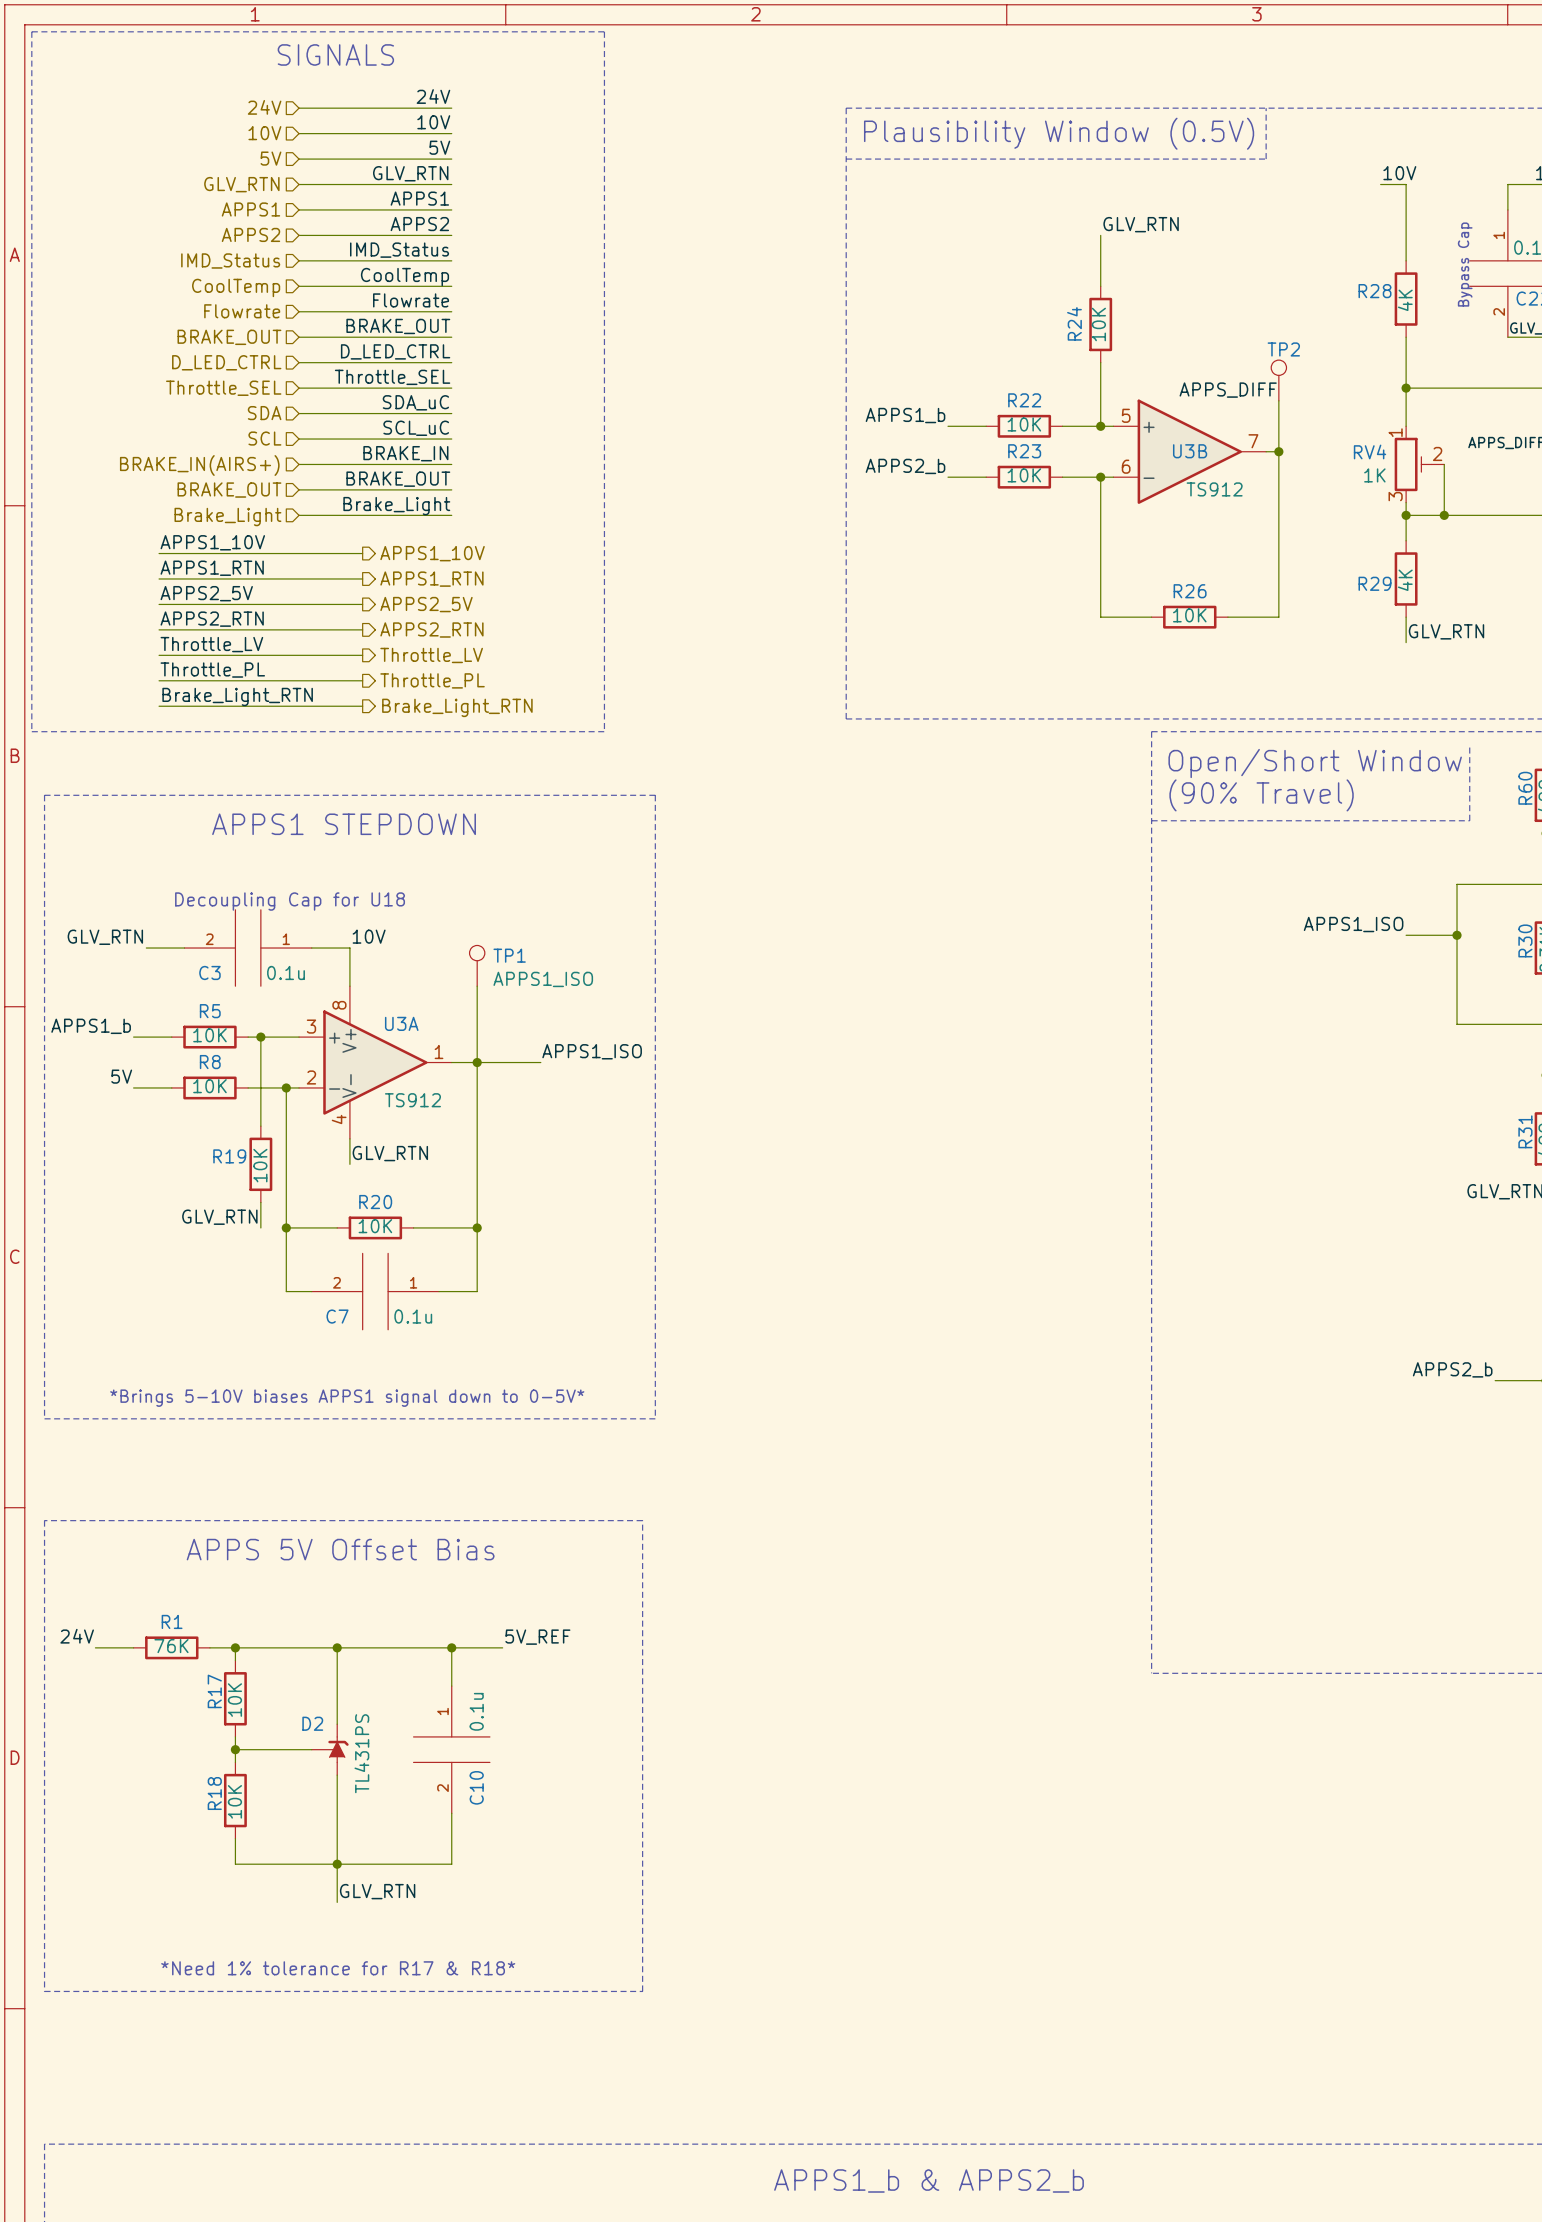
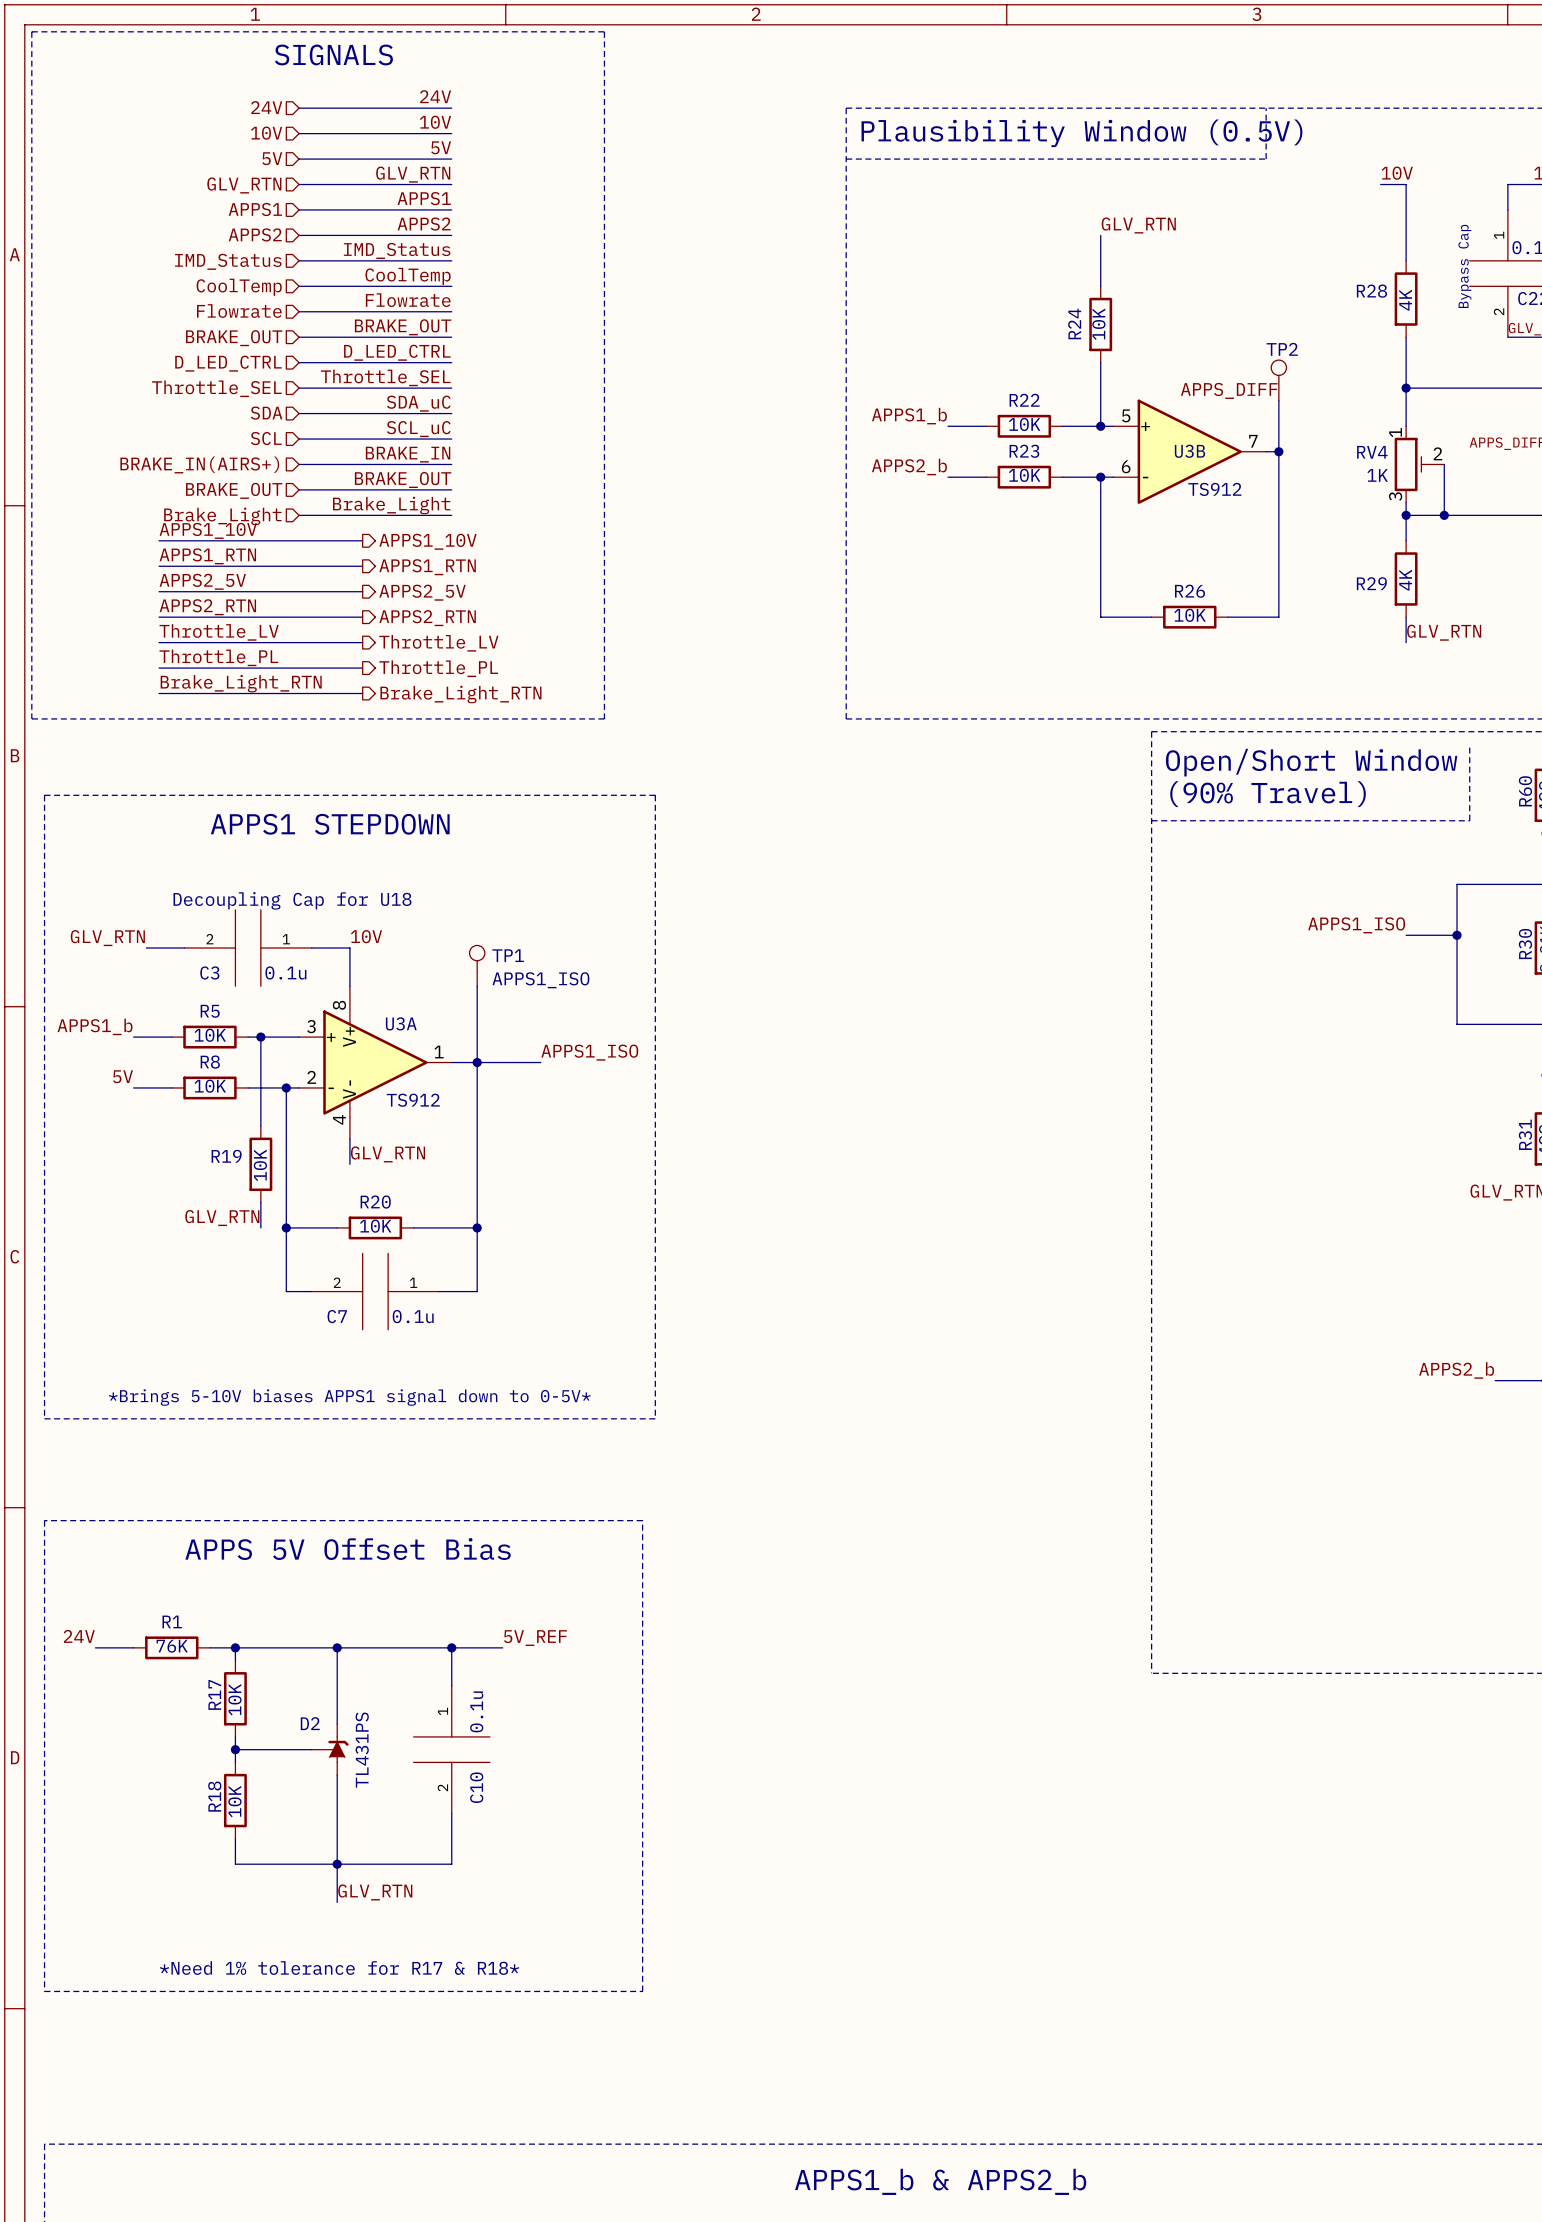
label position: APPS1_10V (212, 542) -> APPS1_10V (208, 530)
wire: (159, 553) (362, 553) -> (159, 540) (362, 540)
hierarchical label position: APPS1_10V (432, 553) -> APPS1_10V (428, 541)
label position: APPS1_RTN (212, 568) -> APPS1_RTN (207, 556)
wire: (159, 578) (362, 578) -> (159, 566) (362, 566)
hierarchical label position: APPS1_RTN (431, 579) -> APPS1_RTN (427, 567)
label position: APPS2_5V (206, 593) -> APPS2_5V (202, 581)
wire: (159, 604) (362, 604) -> (159, 591) (362, 591)
hierarchical label position: APPS2_5V (426, 604) -> APPS2_5V (422, 592)
label position: APPS2_RTN (212, 619) -> APPS2_RTN (207, 607)
wire: (159, 629) (362, 629) -> (159, 617) (362, 617)
hierarchical label position: APPS2_RTN (431, 630) -> APPS2_RTN (427, 618)
label position: Throttle_LV (211, 644) -> Throttle_LV (219, 632)
wire: (159, 655) (362, 655) -> (159, 642) (362, 642)
hierarchical label position: Throttle_LV (431, 655) -> Throttle_LV (438, 643)
label position: Throttle_PL (212, 670) -> Throttle_PL (218, 657)
wire: (159, 680) (362, 680) -> (159, 668) (362, 668)
hierarchical label position: Throttle_PL (432, 680) -> Throttle_PL (438, 668)
label position: Brake_Light_RTN (237, 697) -> Brake_Light_RTN (241, 683)
wire: (159, 706) (362, 706) -> (159, 693) (362, 693)
hierarchical label position: Brake_Light_RTN (457, 707) -> Brake_Light_RTN (460, 694)
line: (31, 718) (31, 731) (604, 731) (604, 718) -> (31, 718) (604, 718)

